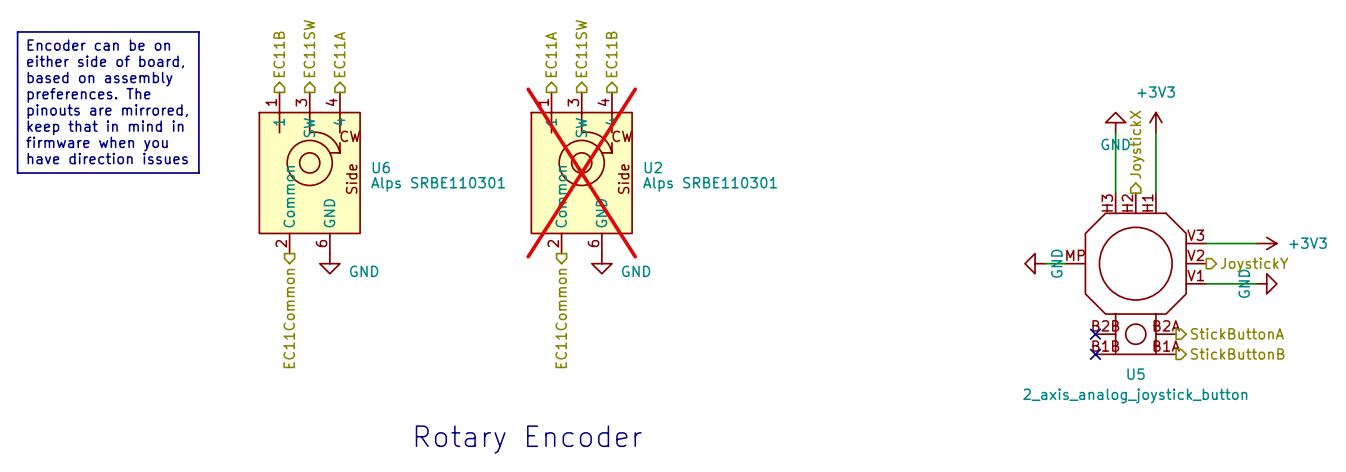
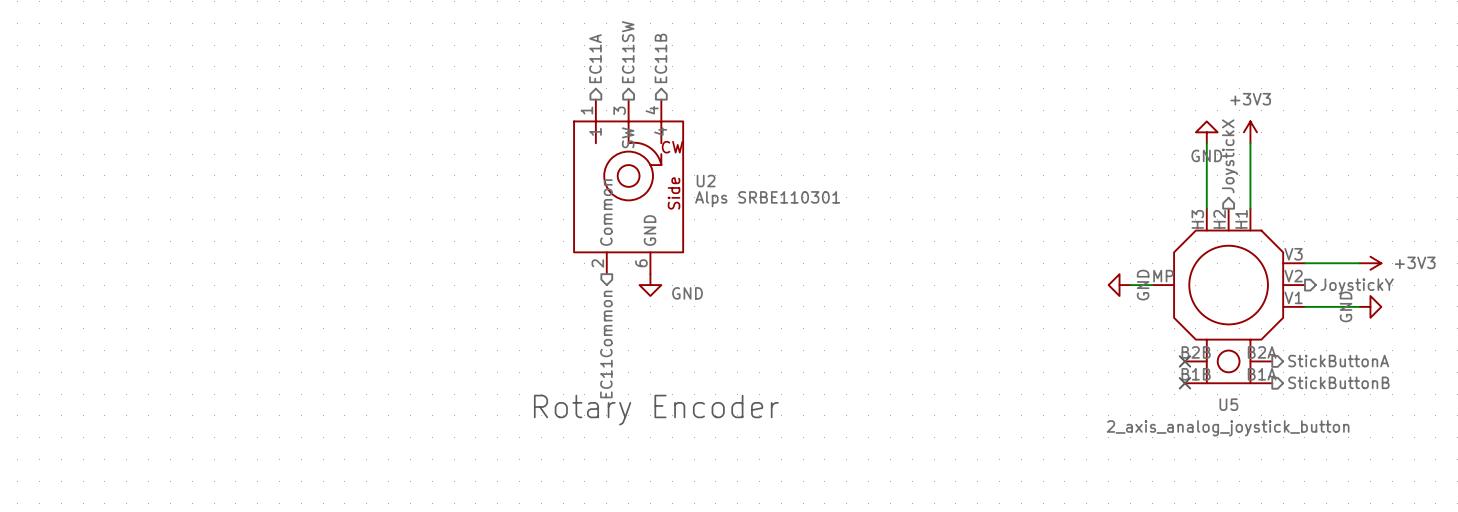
line: (17, 31) (198, 31) (198, 173) (17, 173) (17, 31) -> none
text: Encoder can be on (98, 45) -> none
hierarchical label: EC11SW (309, 48) -> none
hierarchical label: EC11B (279, 54) -> none
hierarchical label: EC11A (339, 54) -> none
text: either side of board, (105, 61) -> none
text: based on assembly (100, 79) -> none
text: preferences. The (89, 95) -> none
text: pinouts are mirrored, (107, 111) -> none
text: keep that in mind in (105, 127) -> none
text: firmware when you (96, 144) -> none
text: have direction issues (107, 158) -> none
U6: Alps SRBE110301 (309, 173) -> none
U2 do-not-place cross: (581, 173) -> none
power symbol: GND (329, 263) -> none
hierarchical label: EC11Common (289, 318) -> none
text position: Rotary Encoder (528, 439) -> Rotary Encoder (656, 410)

